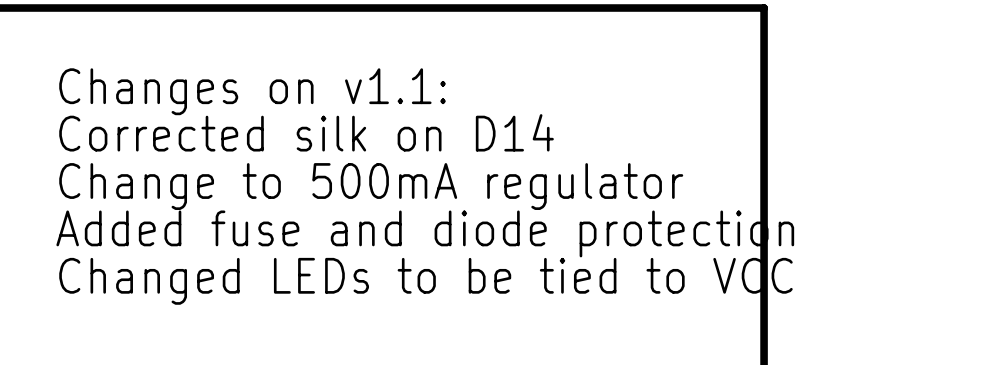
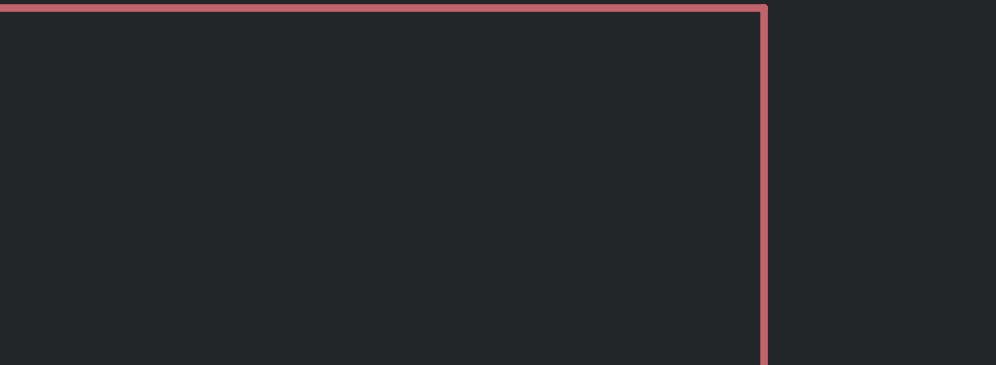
text: Changes on v1.1: (252, 91) -> none
text: Corrected silk on D14 (306, 132) -> none
text: Change to 500mA regulator (371, 186) -> none
text: Added fuse and diode protection (425, 233) -> none
text: Changed LEDs to be tied to VCC (425, 281) -> none

